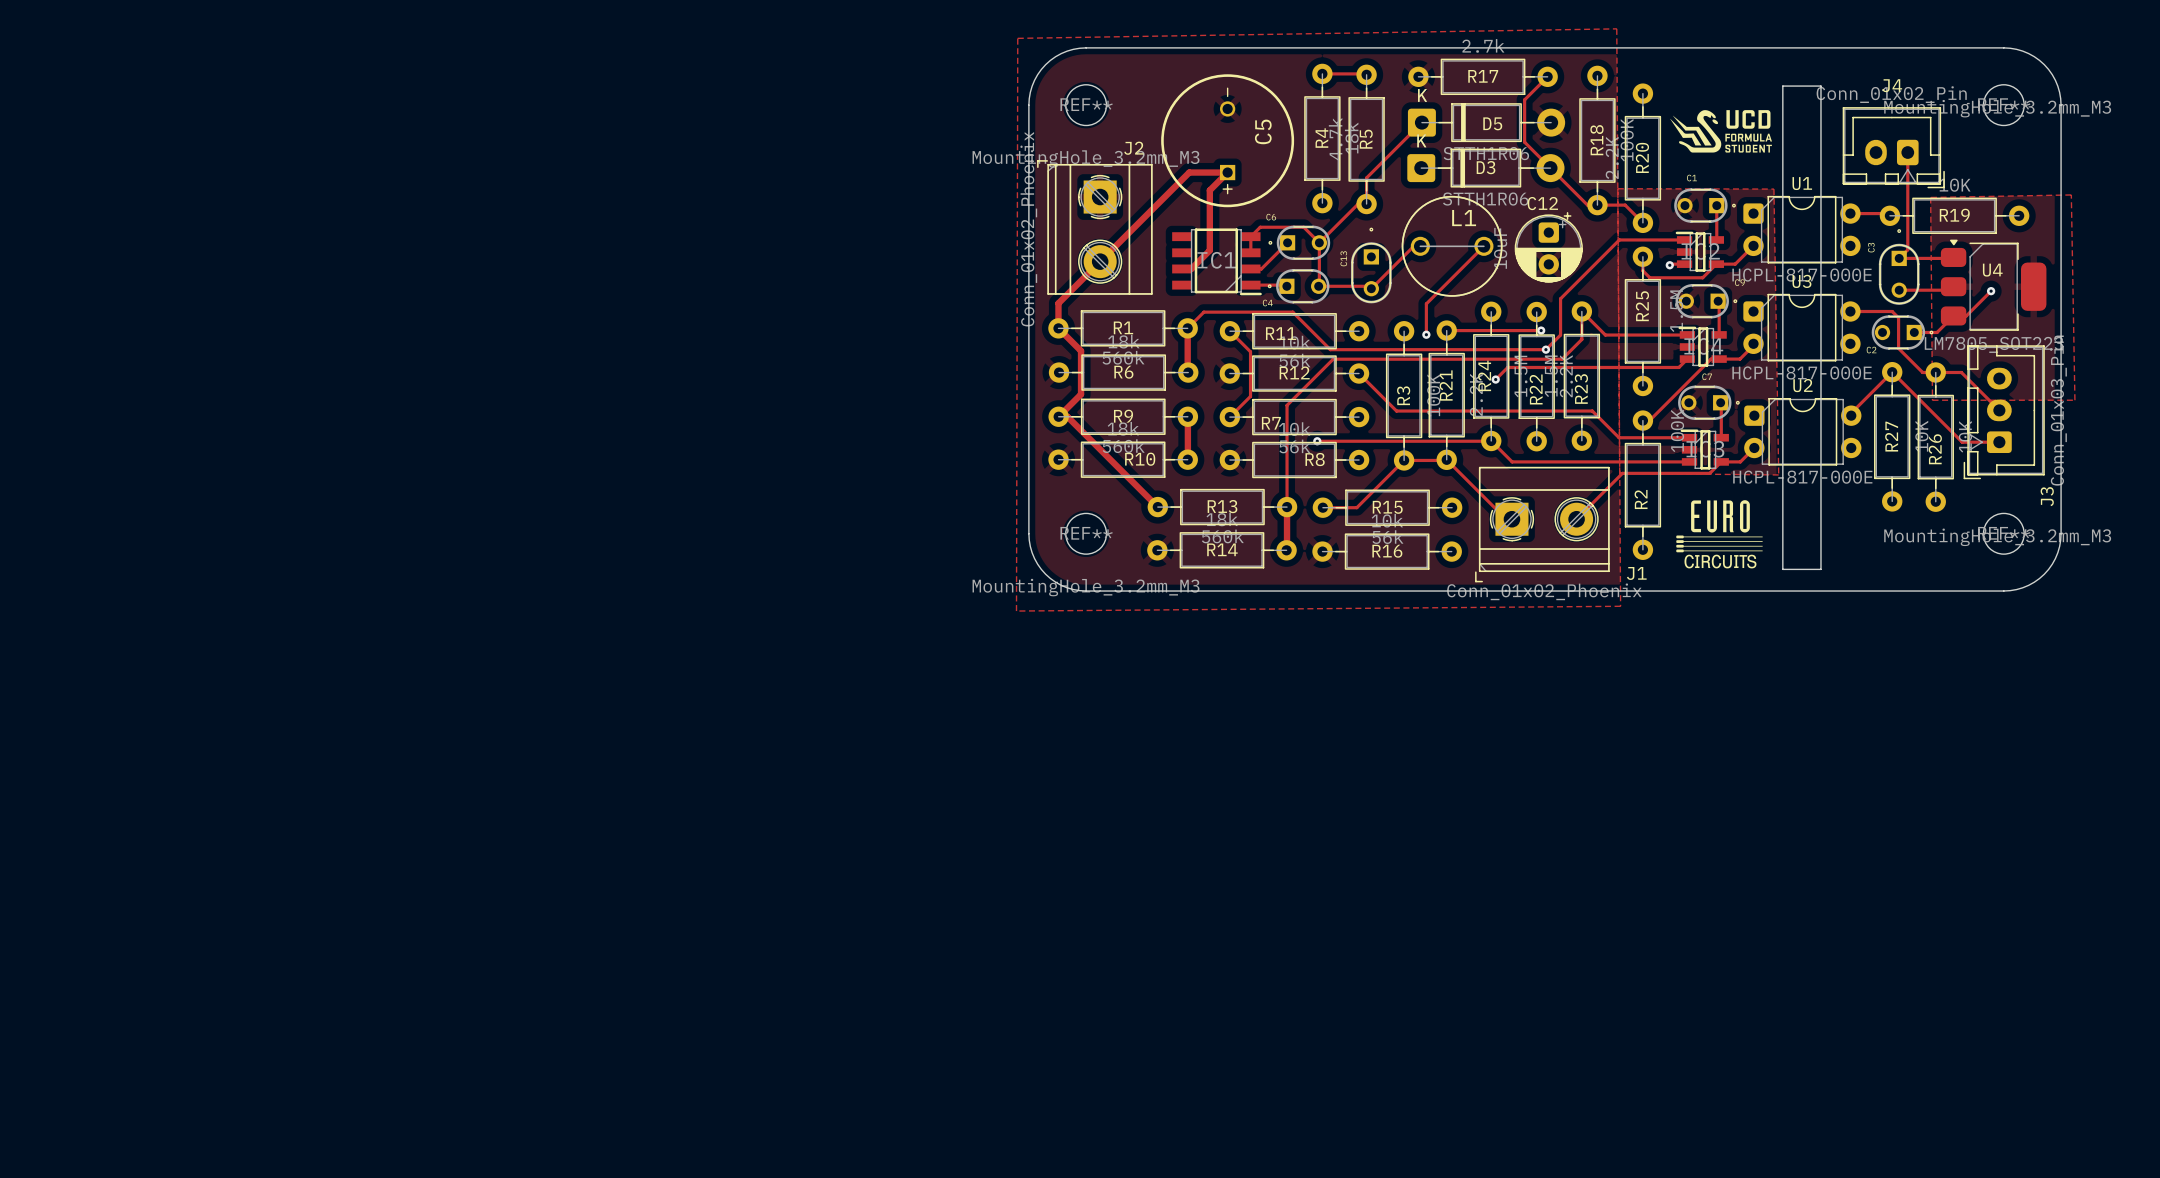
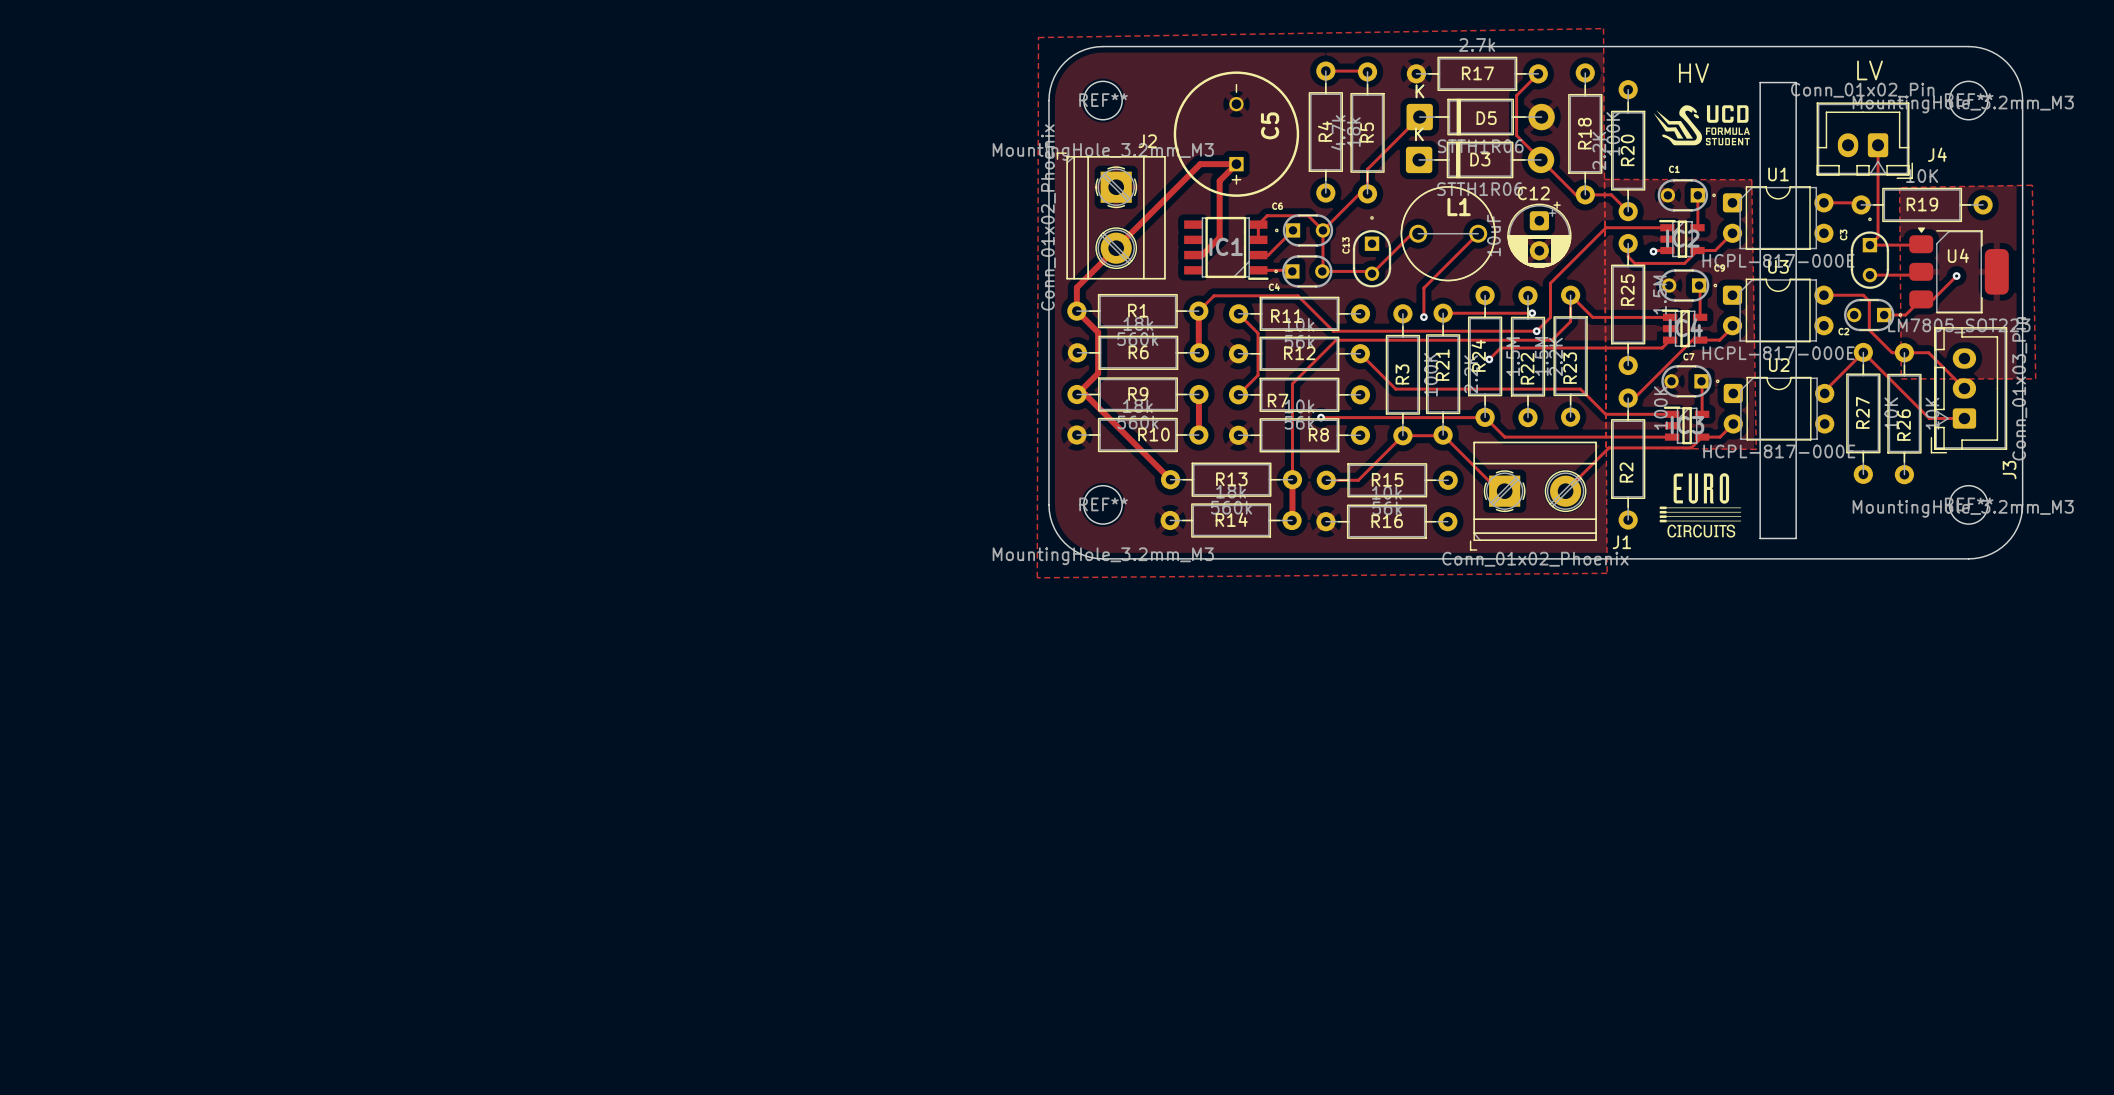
text: none -> LV (1870, 70)
text: none -> HV (1693, 73)
J4 name position: J4 (1892, 85) -> J4 (1937, 154)

